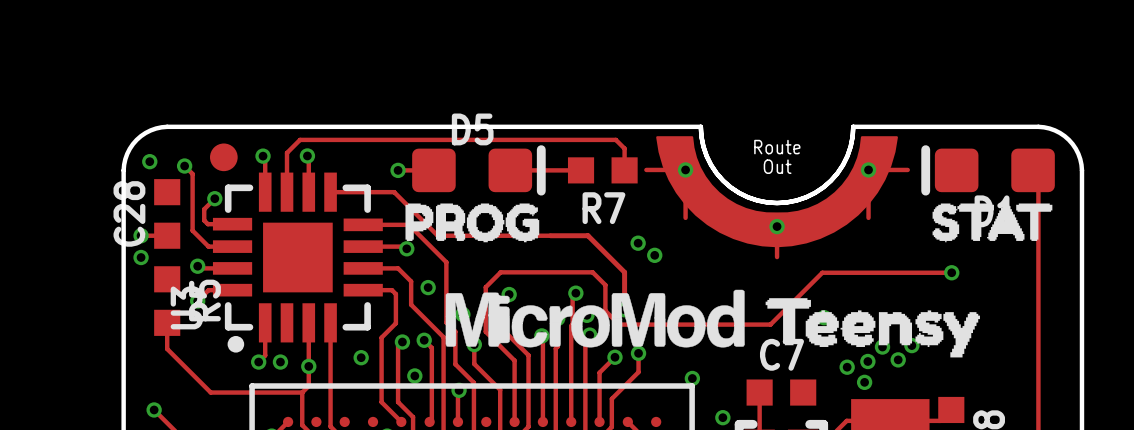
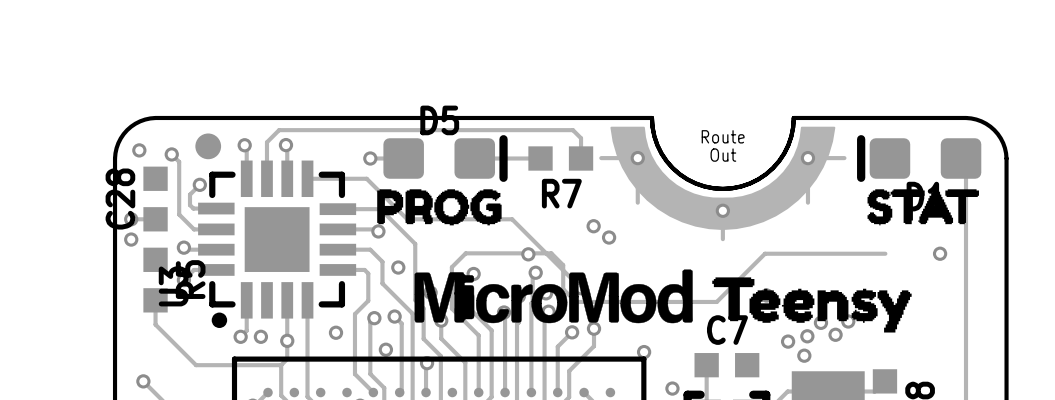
track: (550, 235) (588, 235) (624, 272) (624, 309) -> (512, 219) (581, 288)
via position: (951, 272) -> (940, 253)
via: none -> (528, 254)

